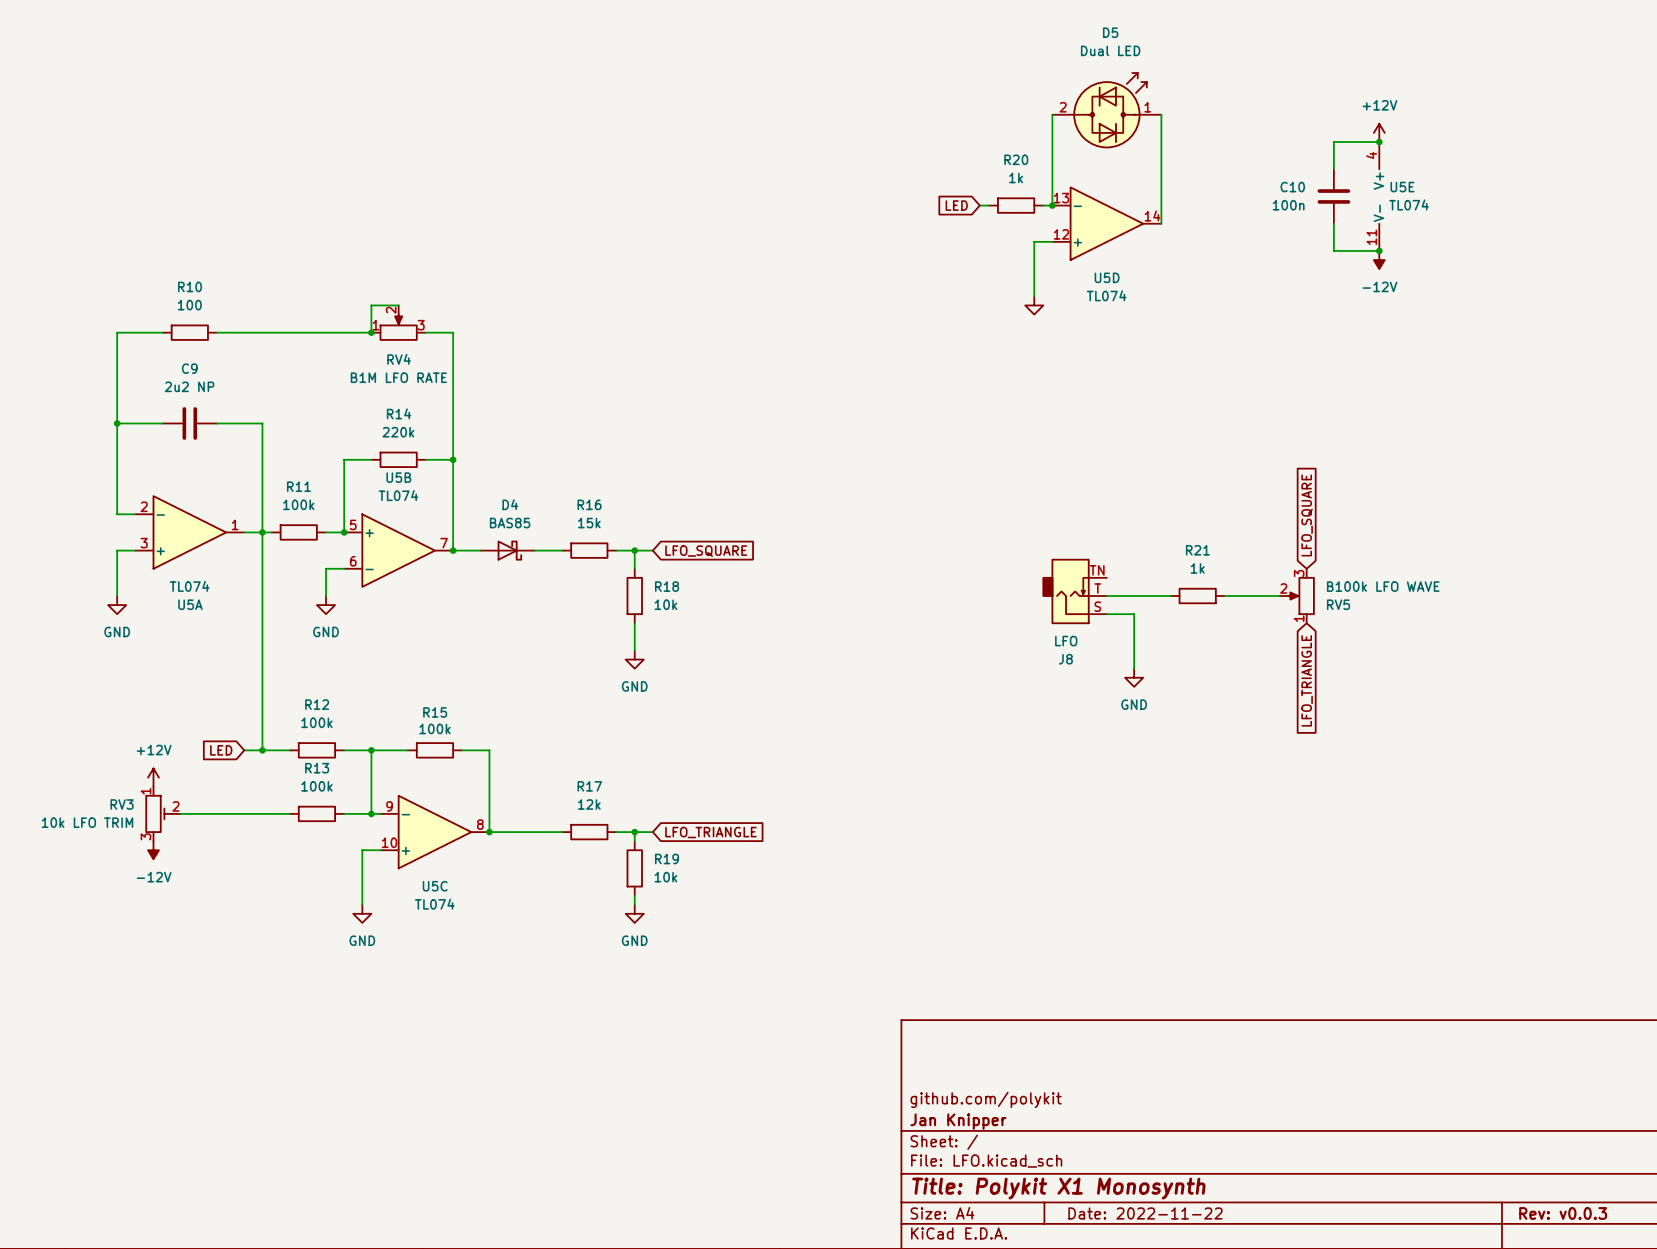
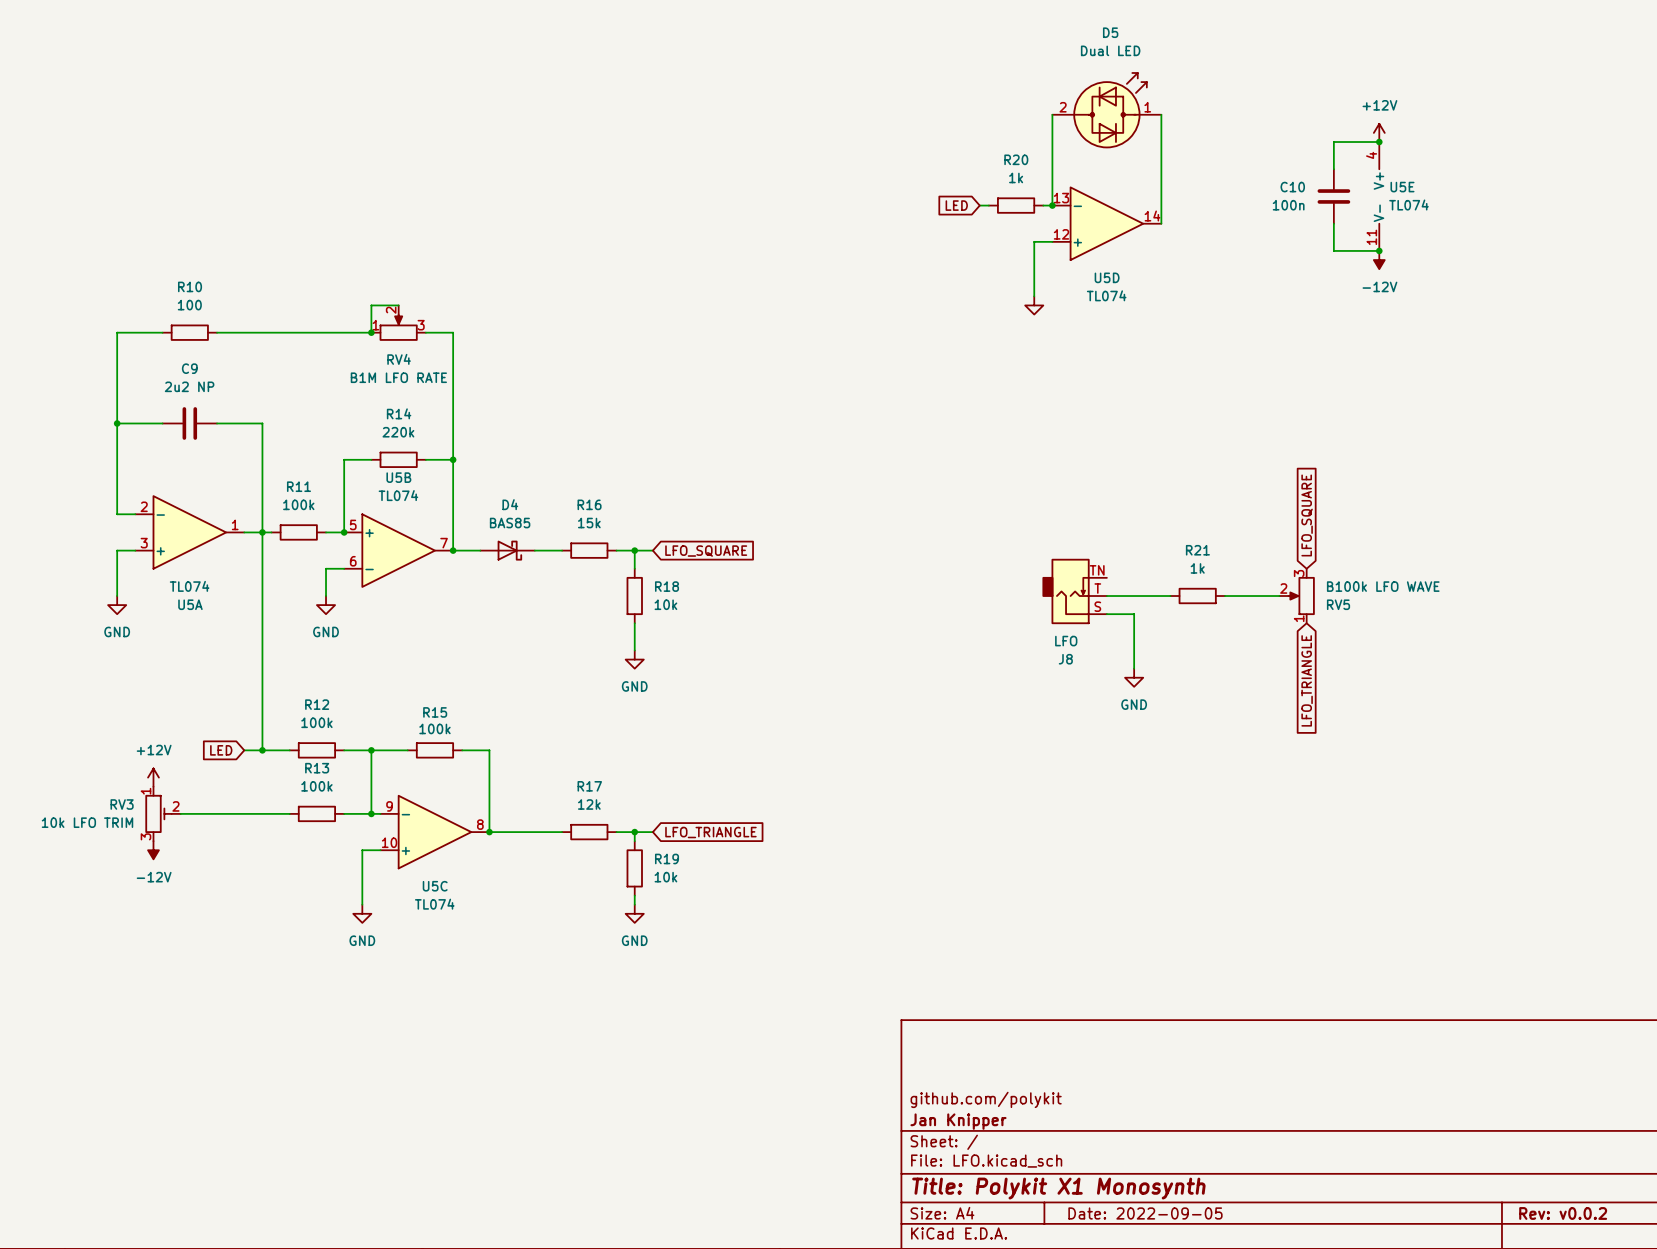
title block: Date: 2022-11-22 (1145, 1213) -> Date: 2022-09-05 (1145, 1213)
title block: Rev: v0.0.3 (1563, 1213) -> Rev: v0.0.2 (1563, 1213)

